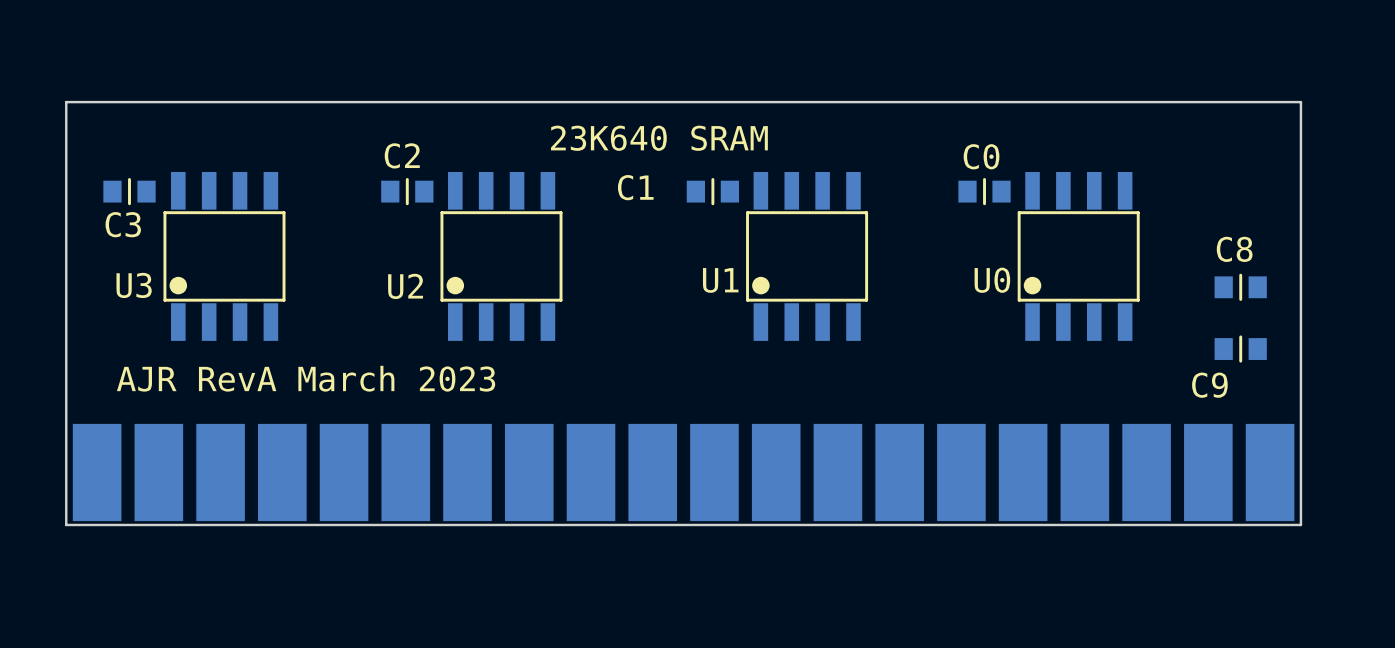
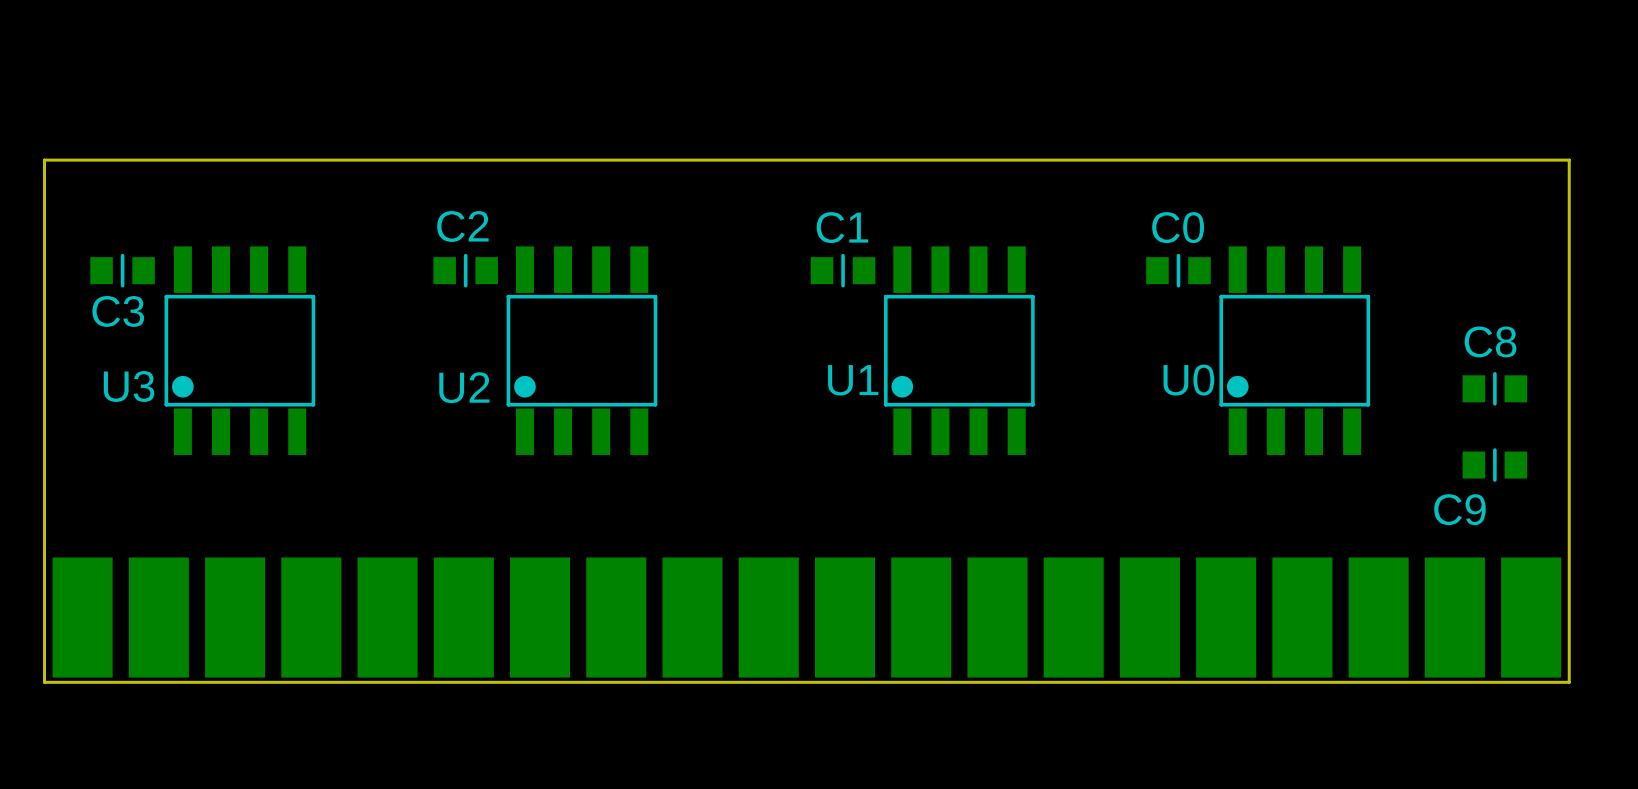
text: 23K640 SRAM (659, 138) -> none
C1 name position: C1 (635, 187) -> C1 (842, 227)
text: AJR RevA March 2023 (306, 378) -> none

